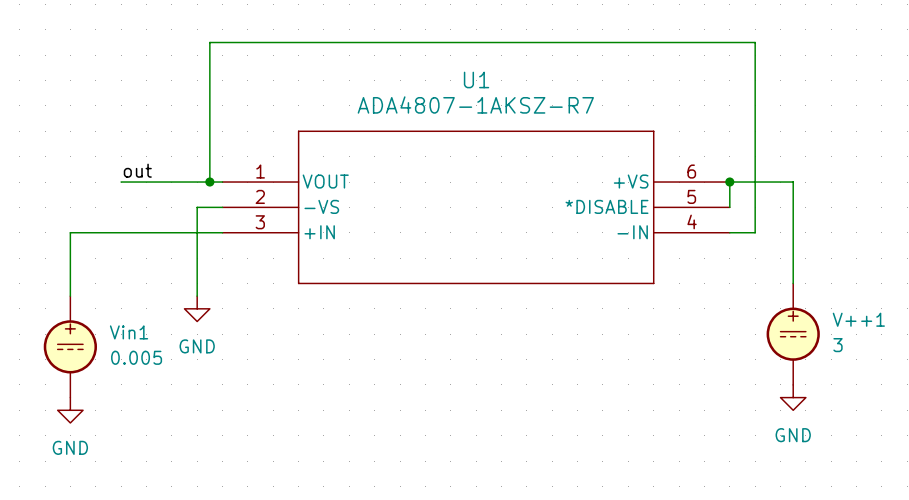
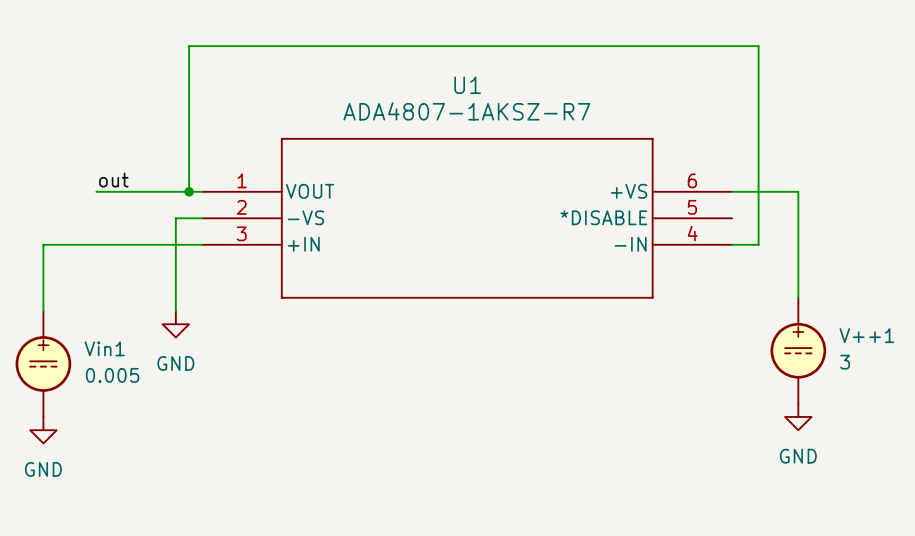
wire: (729, 182) (729, 207) -> none
junction: (729, 182) -> none

